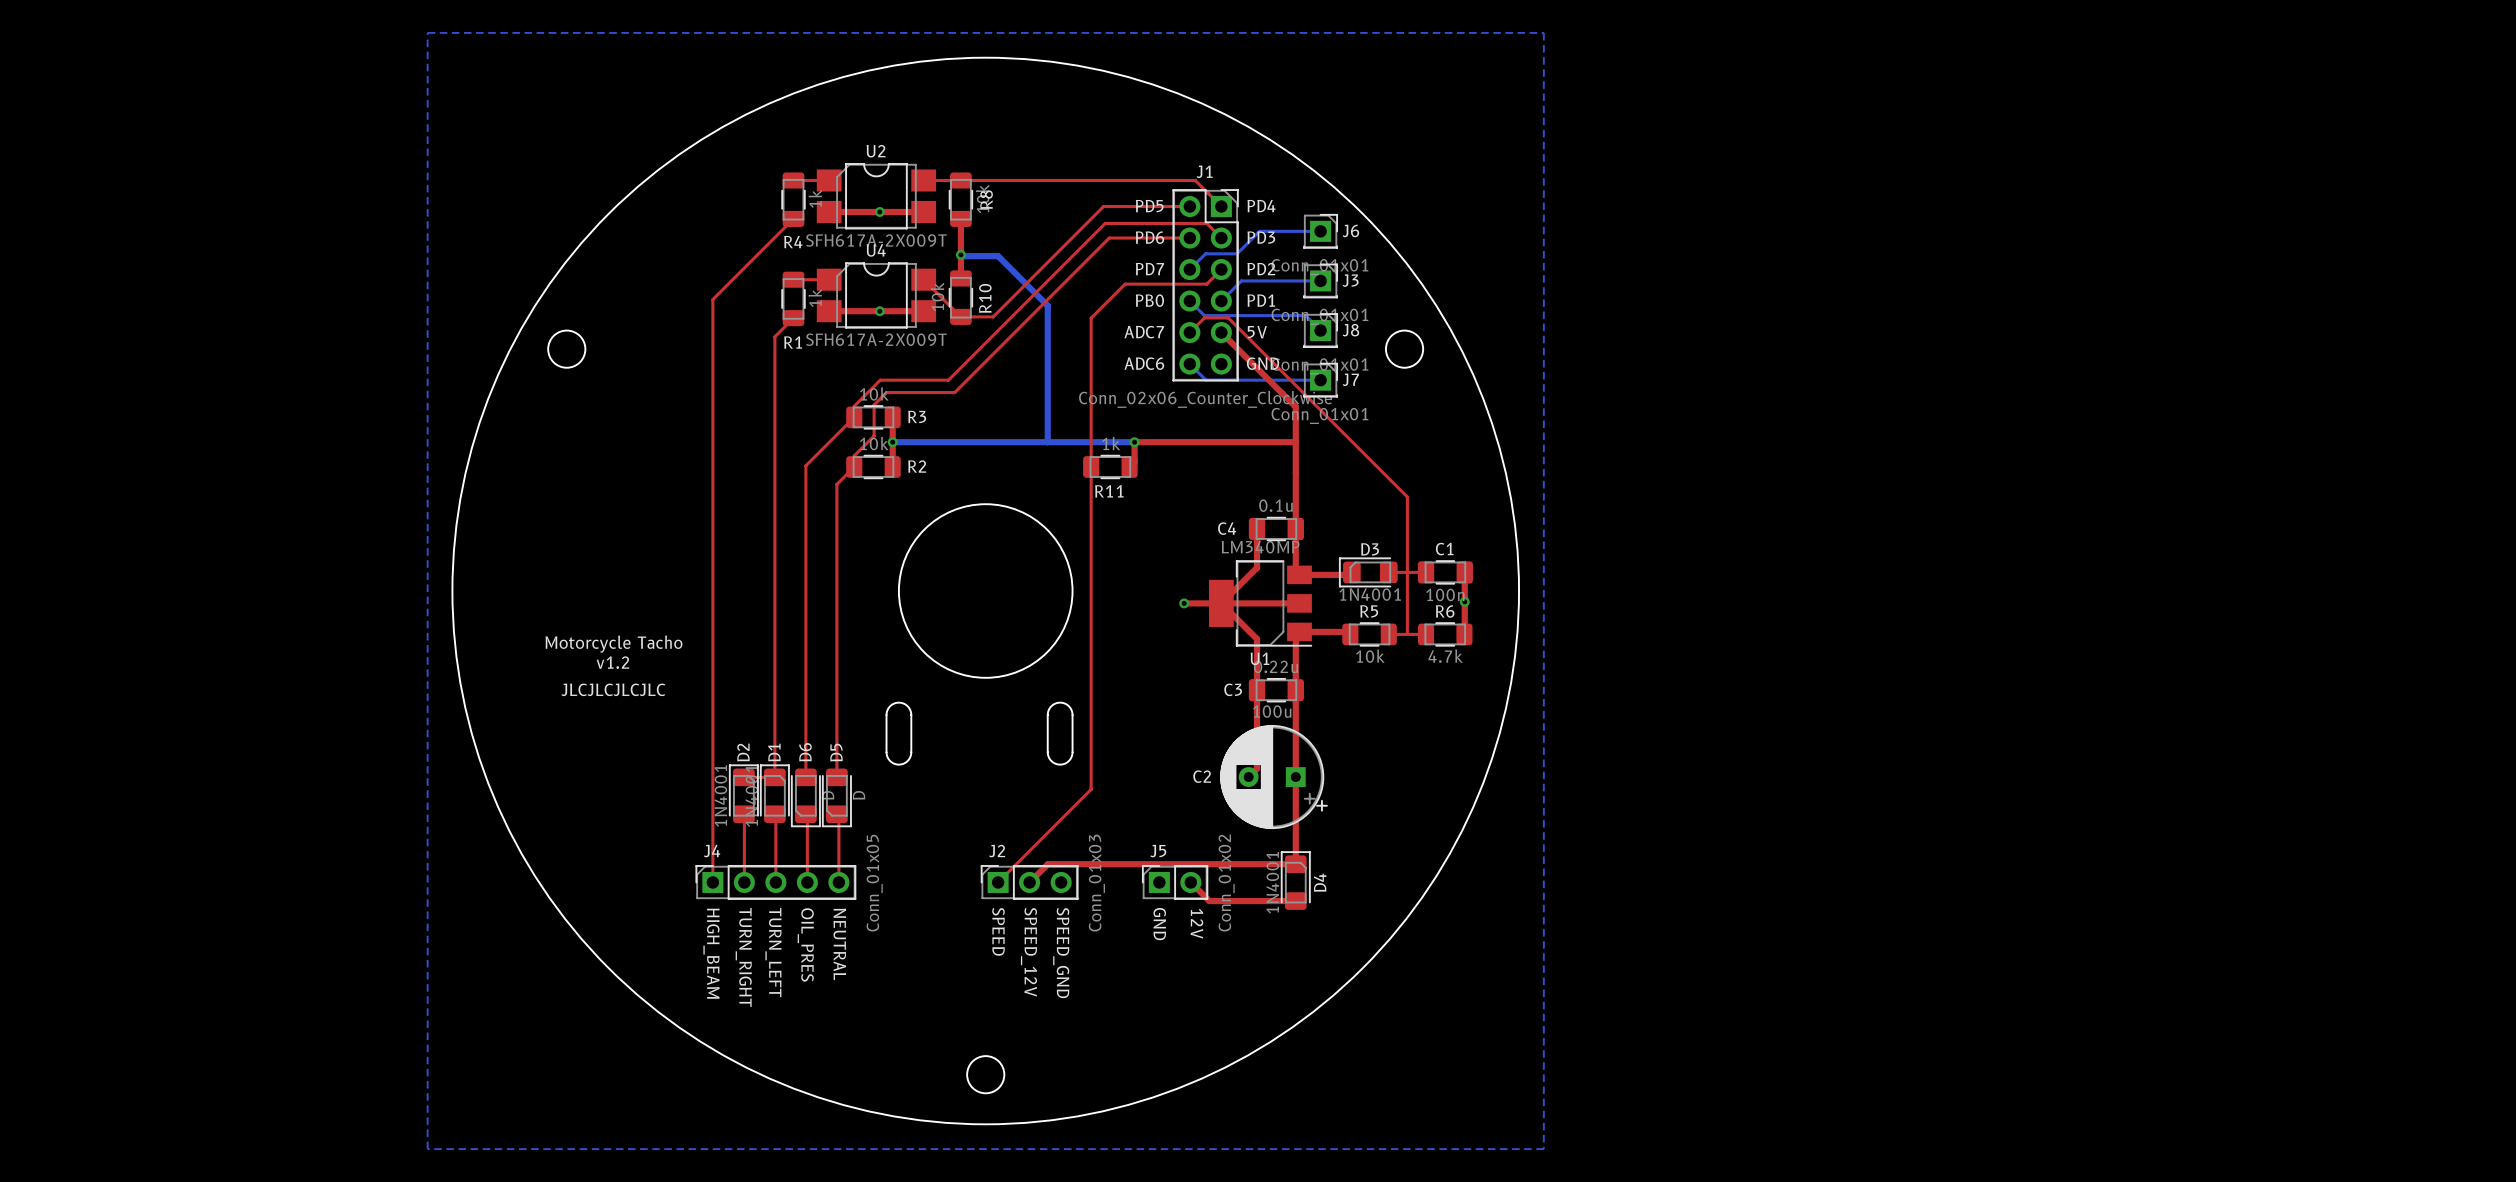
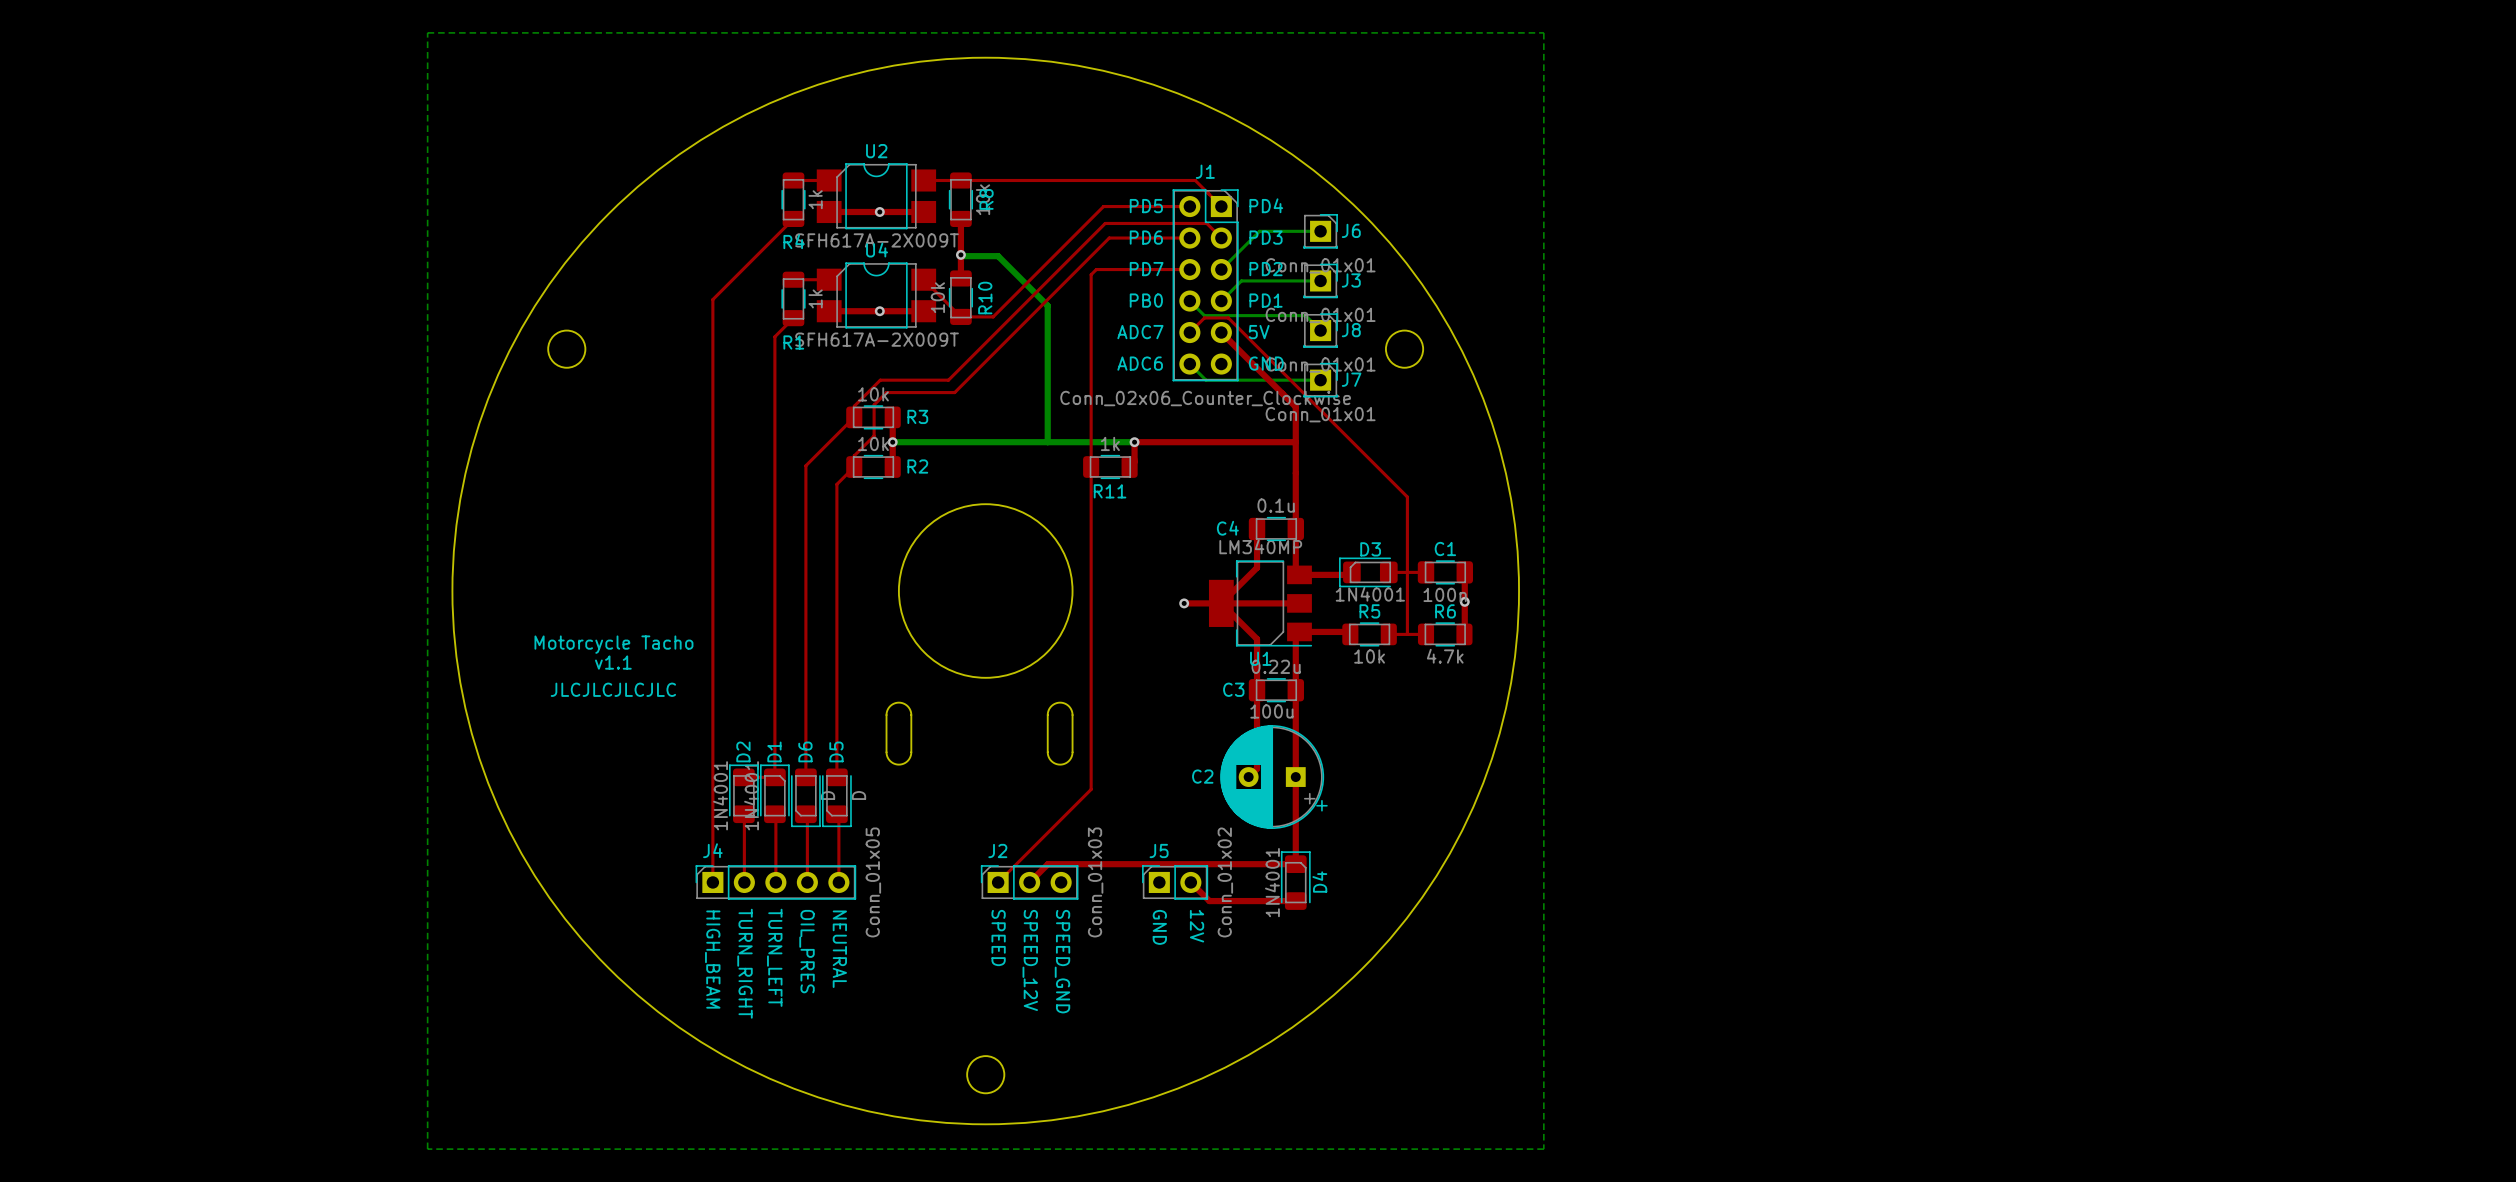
bottom track: (1237, 253) (1205, 253) (1189, 269) -> (1237, 253) (1221, 269)
top track: (1221, 269) (1206, 284) (1125, 284) (1091, 318) -> (1189, 269) (1096, 269) (1091, 274) (1091, 318)
text: v1.2 (612, 662) -> v1.1 (613, 662)

